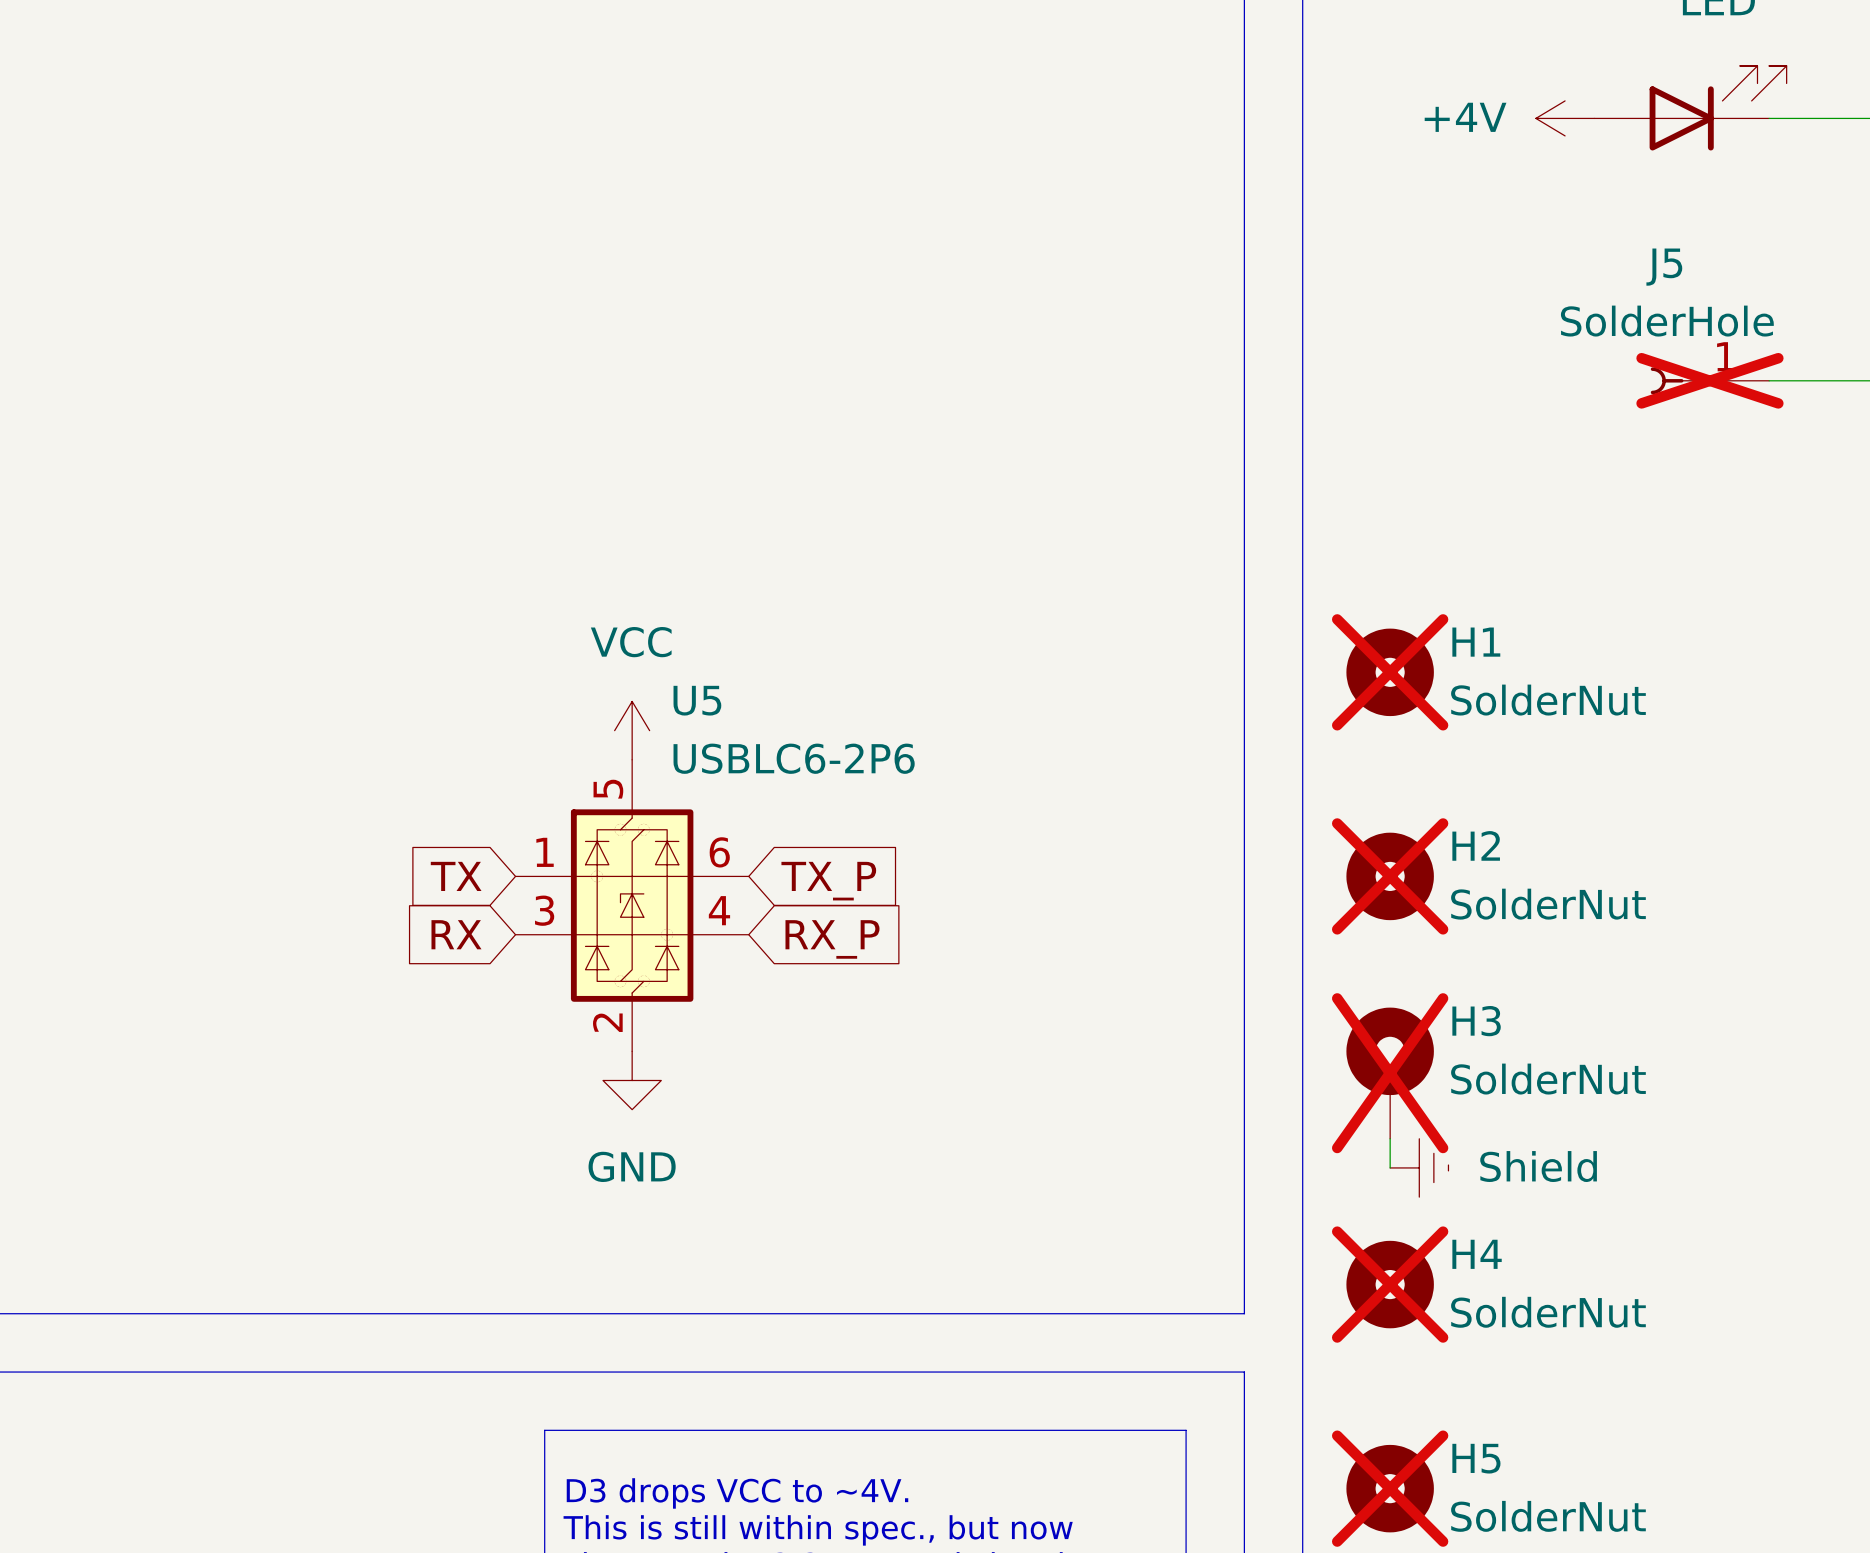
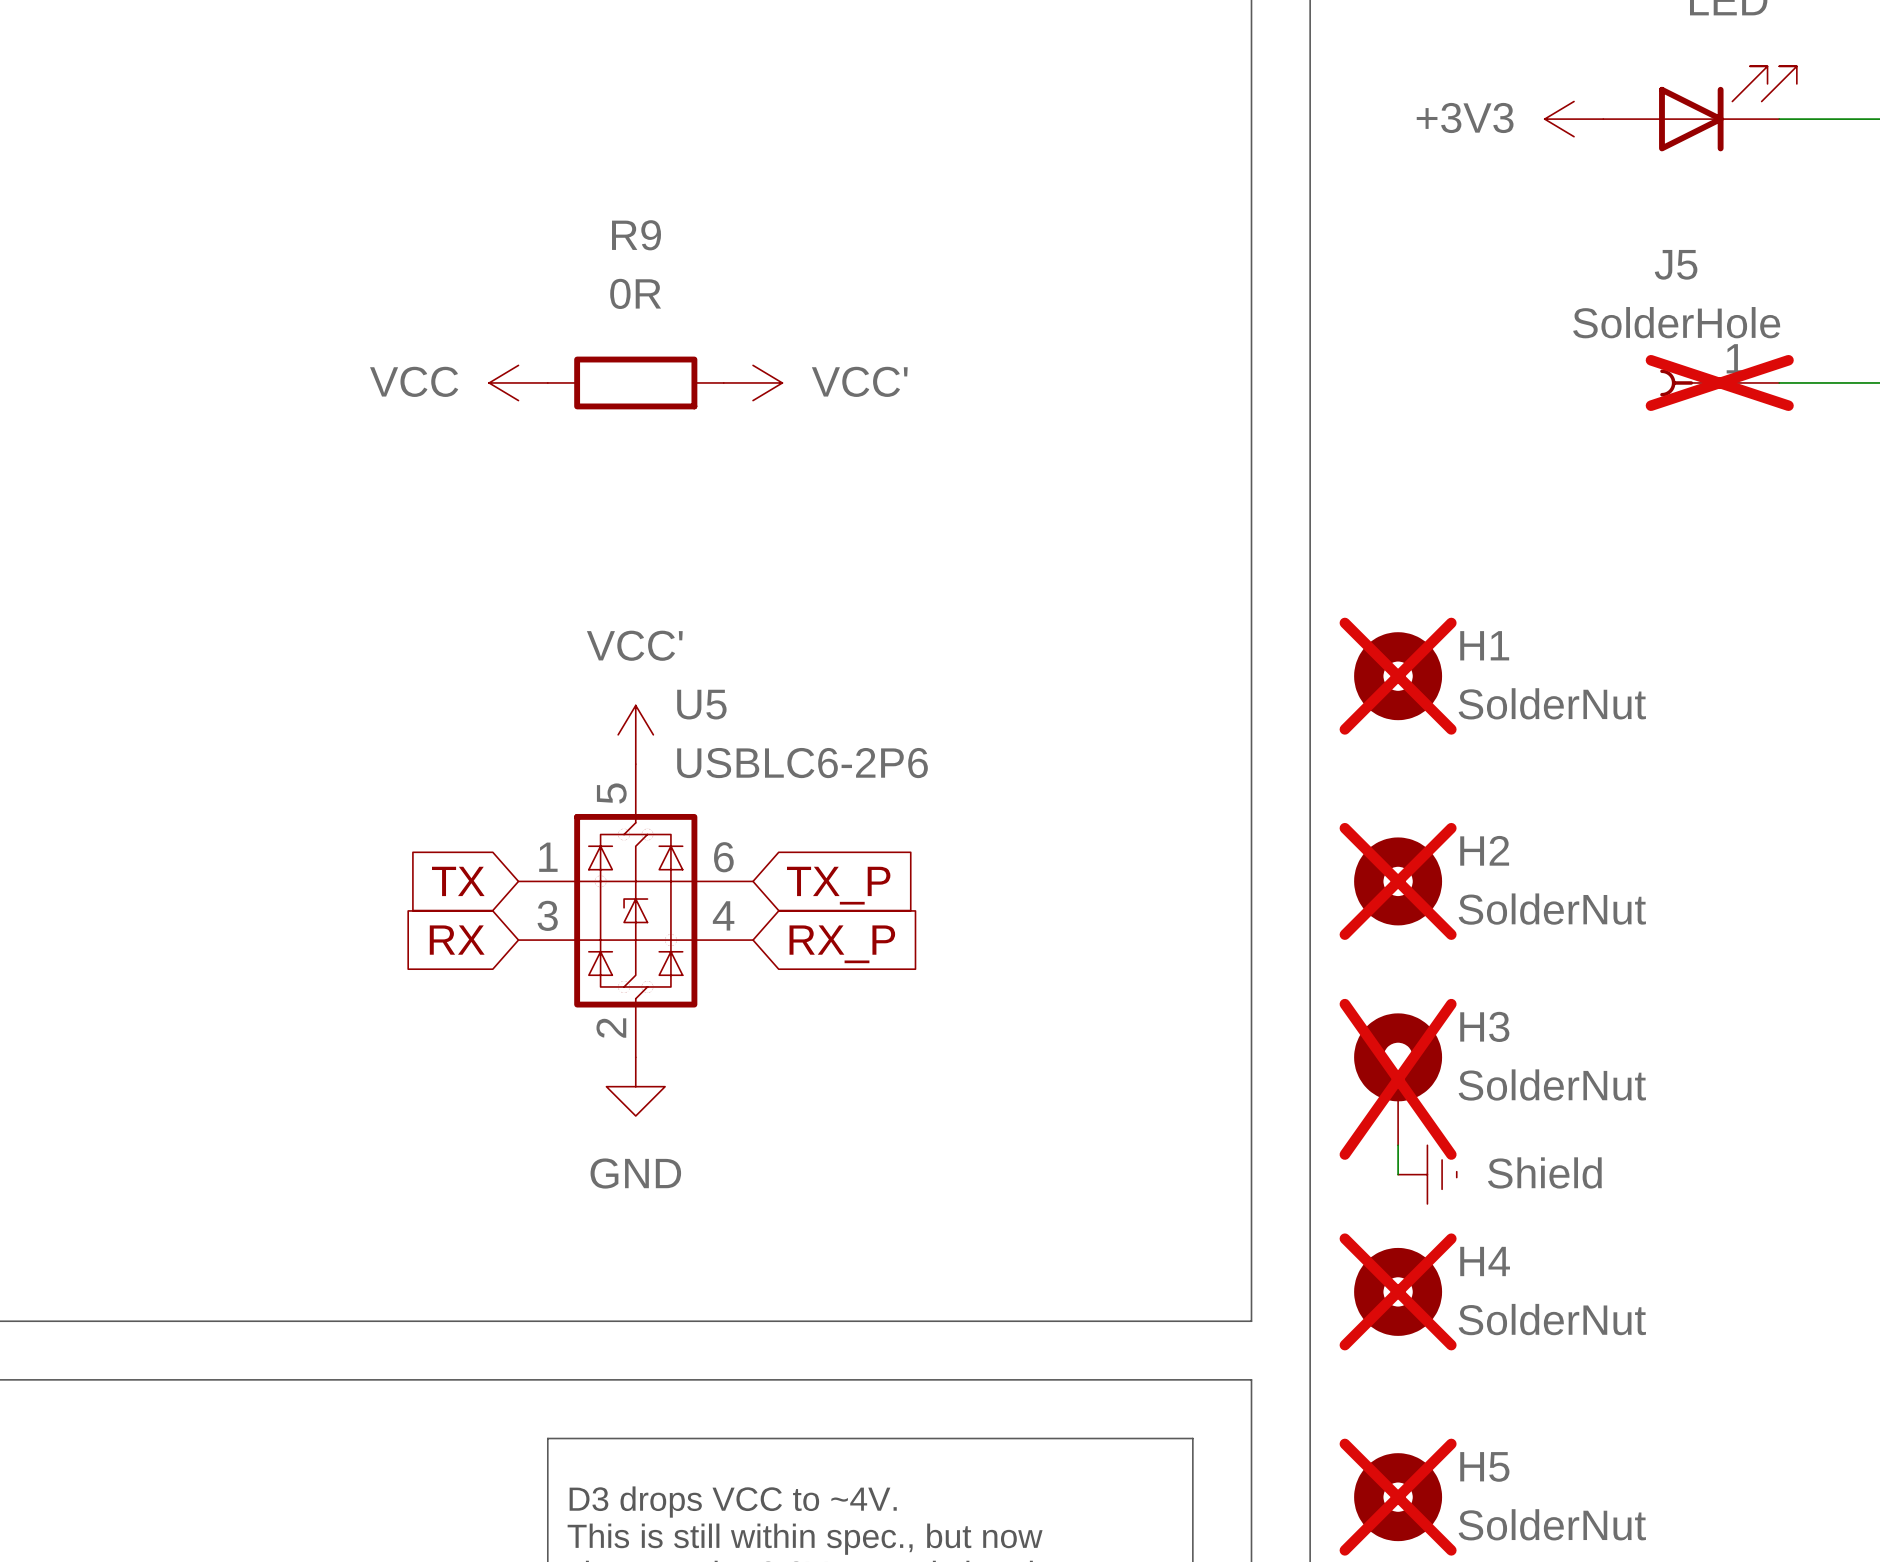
power symbol: +4V (1565, 118) -> +3V3 (1574, 119)
power symbol: none -> VCC (518, 382)
R9: none -> 0R (635, 382)
power symbol: none -> VCC' (753, 382)
power symbol: VCC (632, 730) -> VCC' (635, 734)

